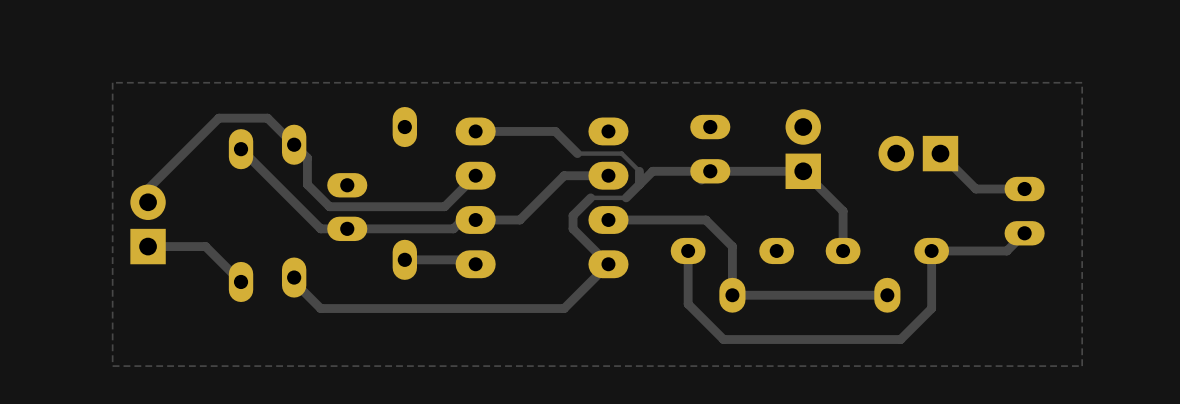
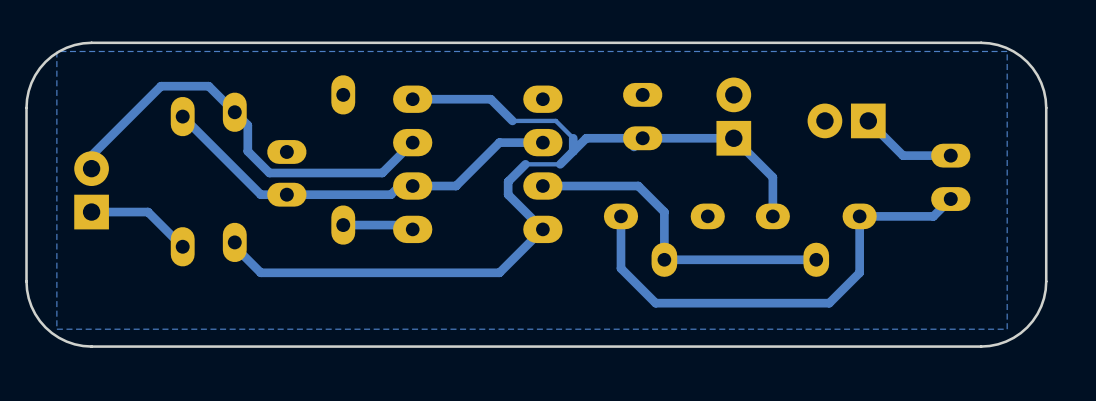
board edge: none -> (981, 42) (91, 42) (74, 45) (59, 51) (45, 61) (35, 75) (27, 99) (26, 281) (28, 298) (35, 314) (51, 333) (66, 341) (91, 346) (981, 346) (998, 344) (1013, 337) (1027, 327) (1037, 314) (1044, 298) (1046, 281) (1046, 107) (1041, 82) (1027, 61) (1006, 47) (981, 42)

